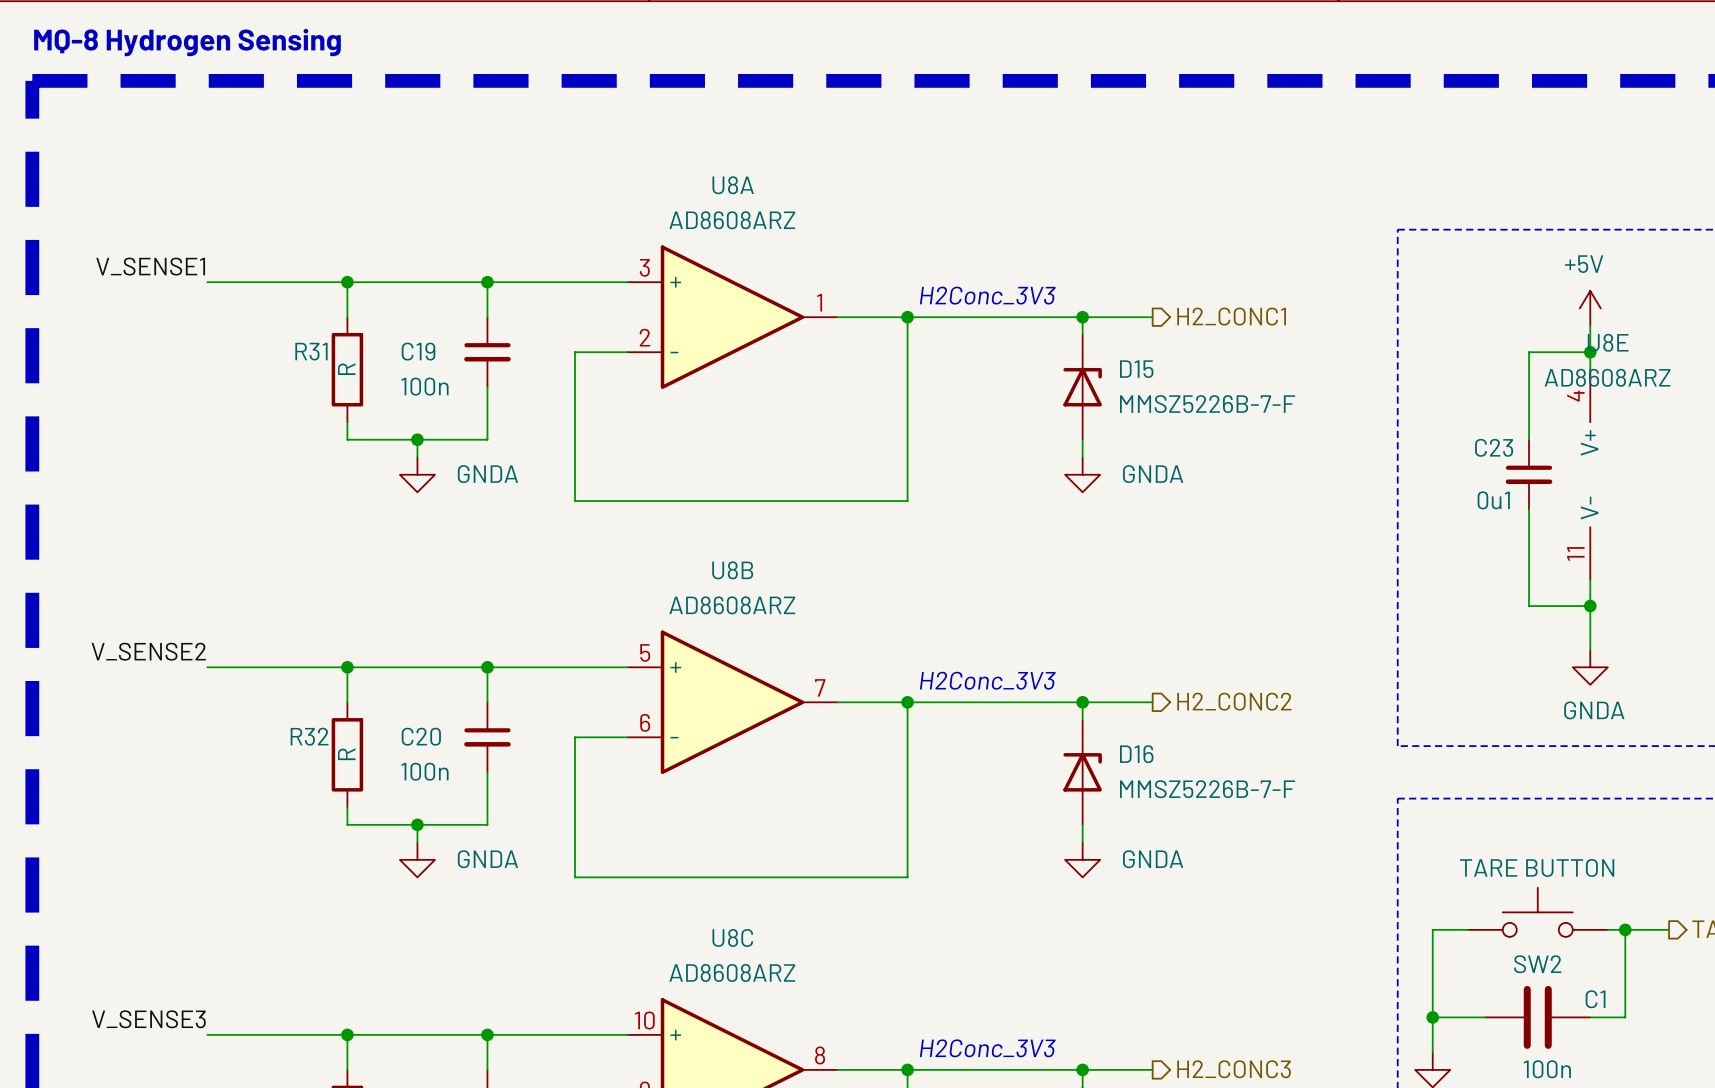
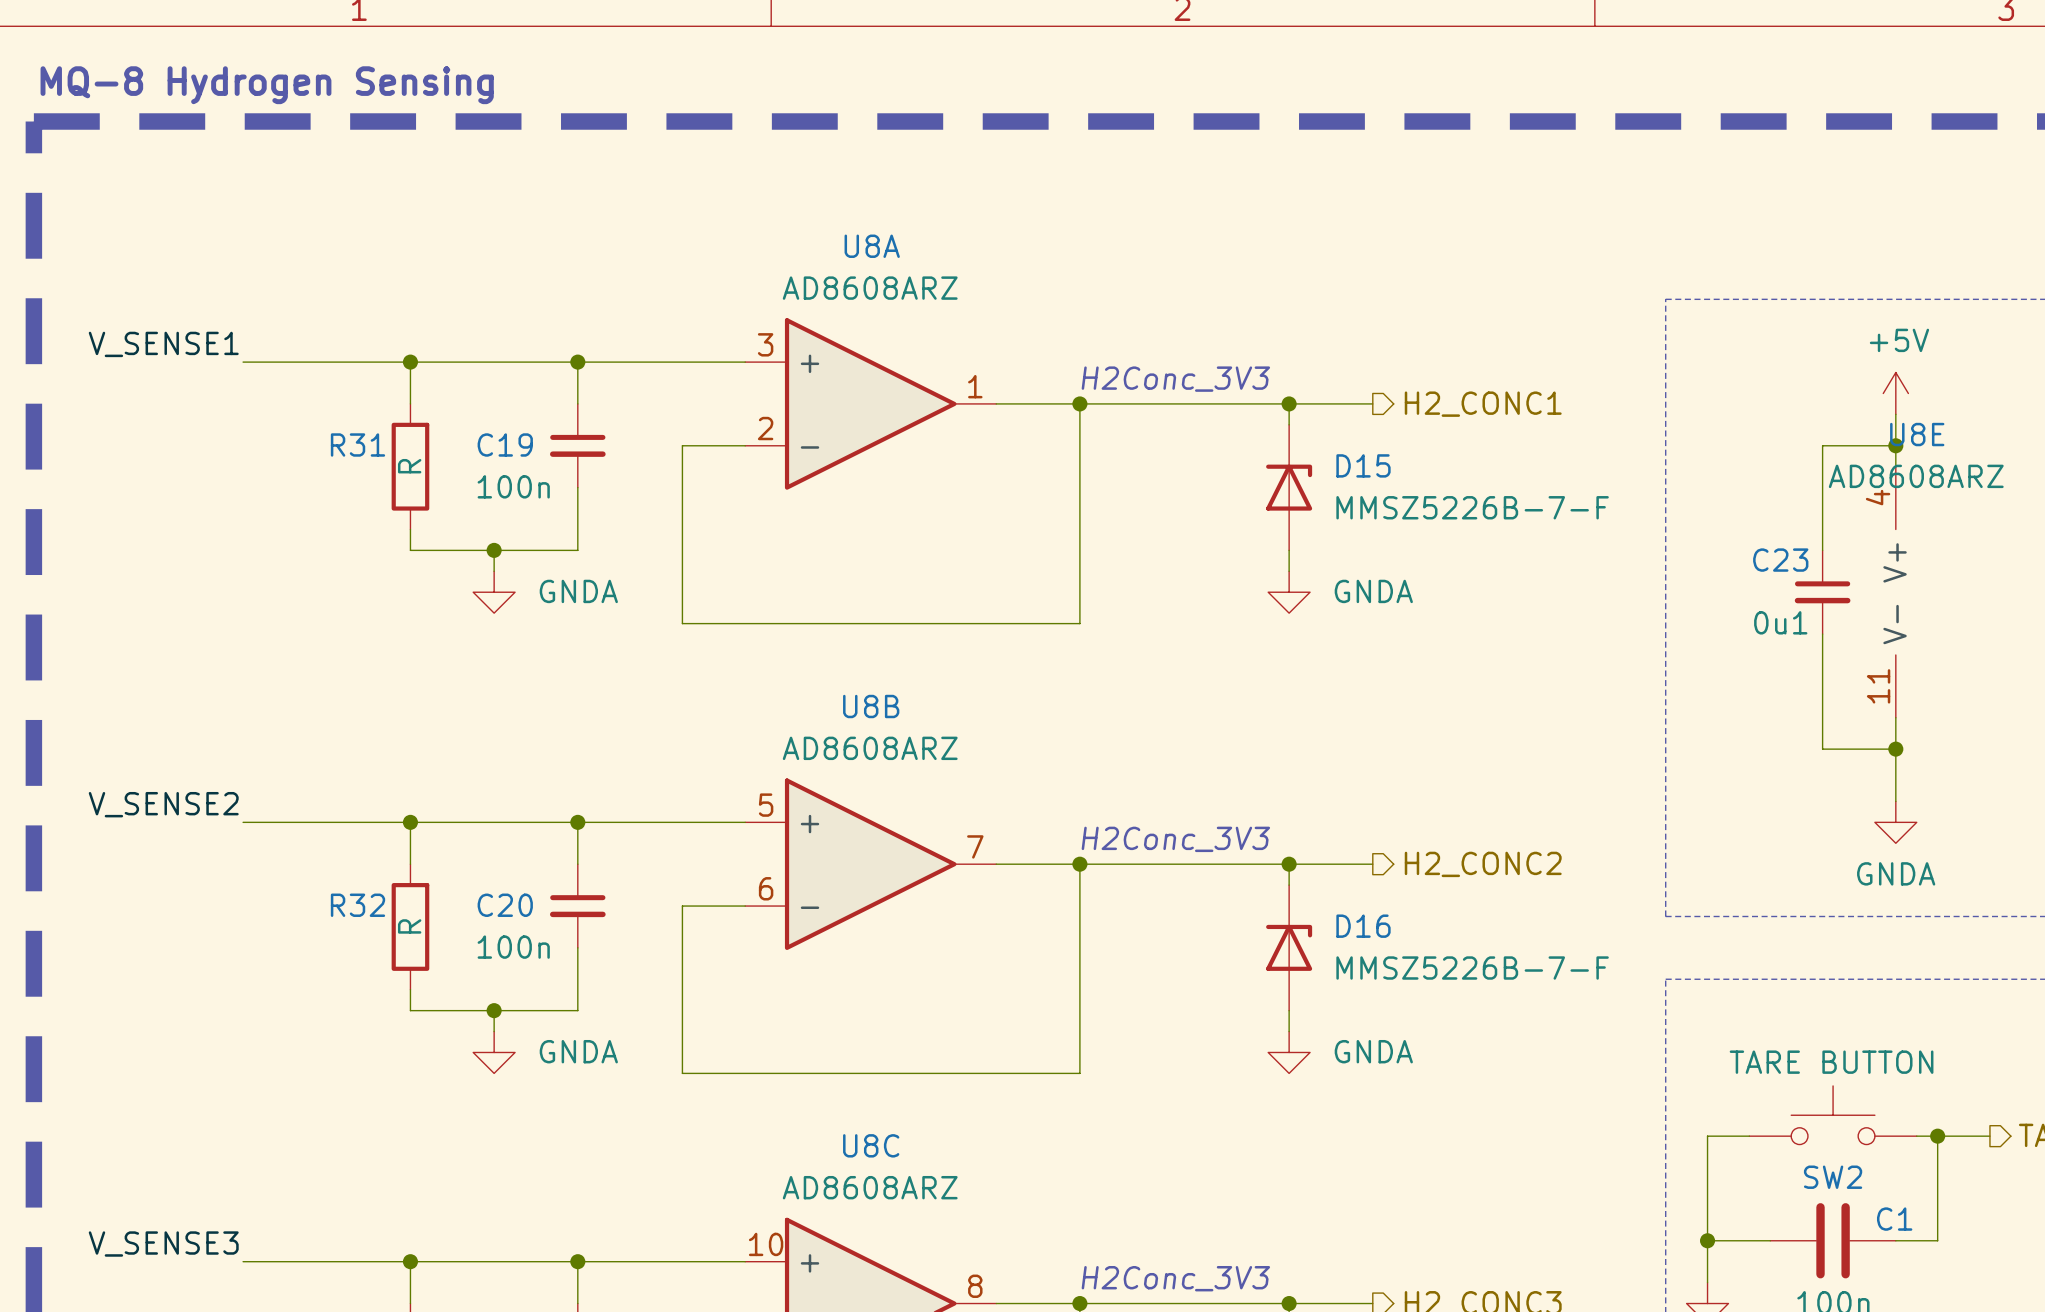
text position: MQ-8 Hydrogen Sensing (187, 42) -> MQ-8 Hydrogen Sensing (267, 85)

